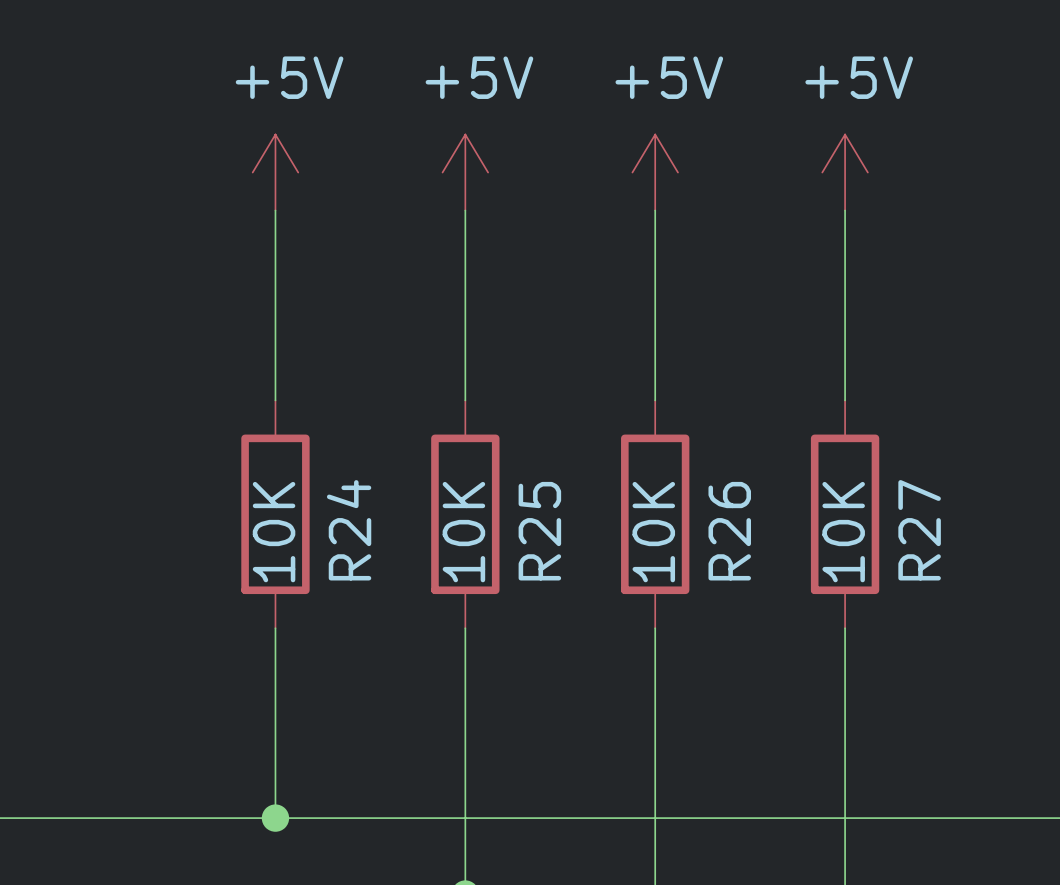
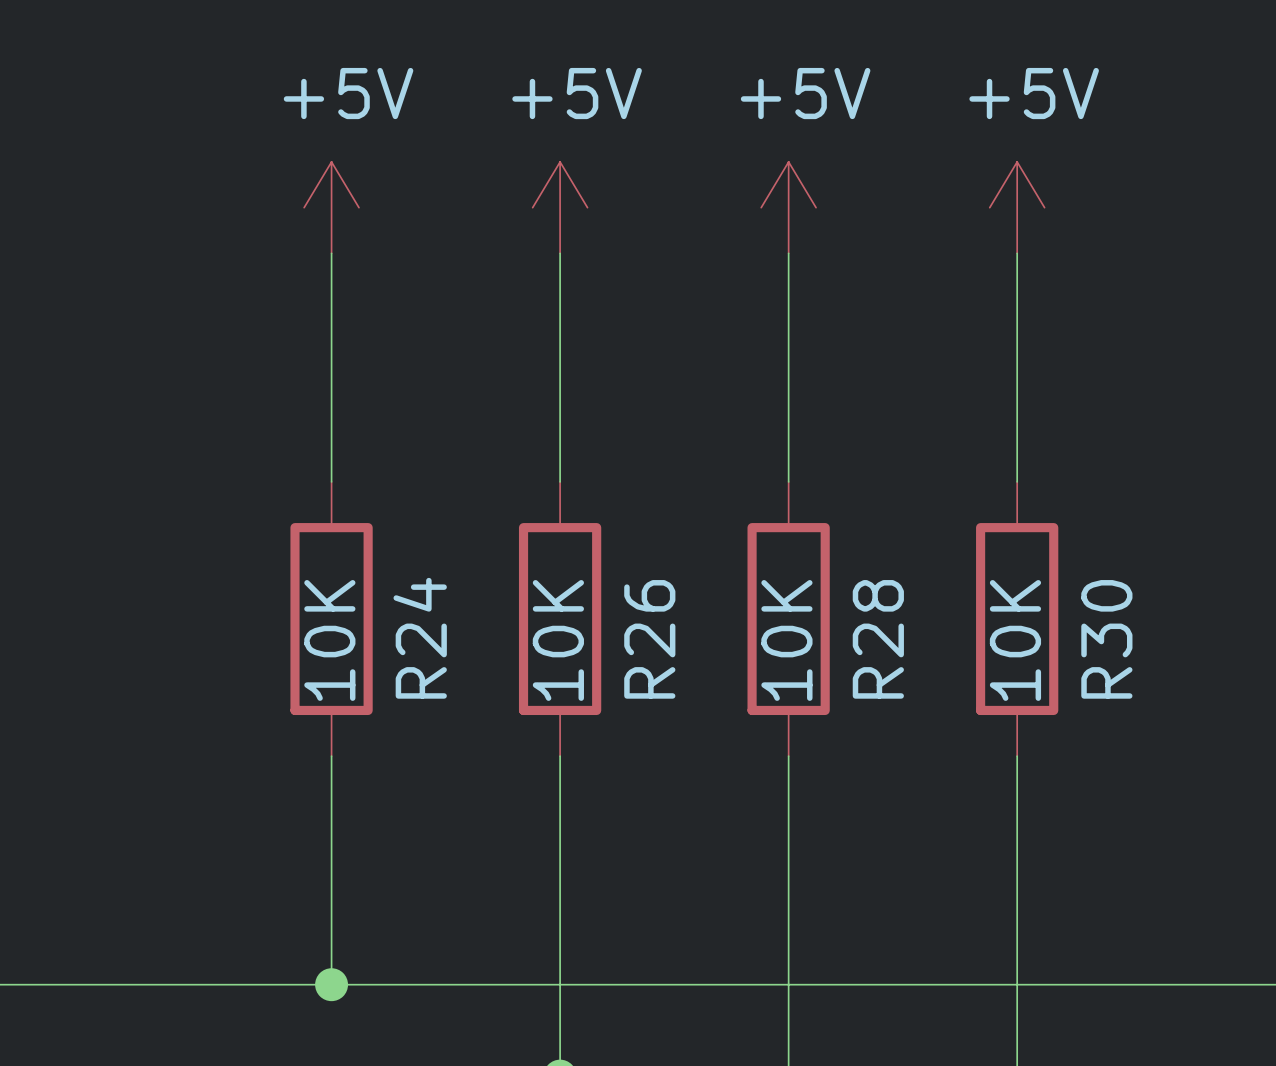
R27 name: R27 (919, 530) -> R30 (1106, 639)
R25 name: R25 (539, 531) -> R26 (649, 639)
R26 name: R26 (729, 531) -> R28 (878, 639)

